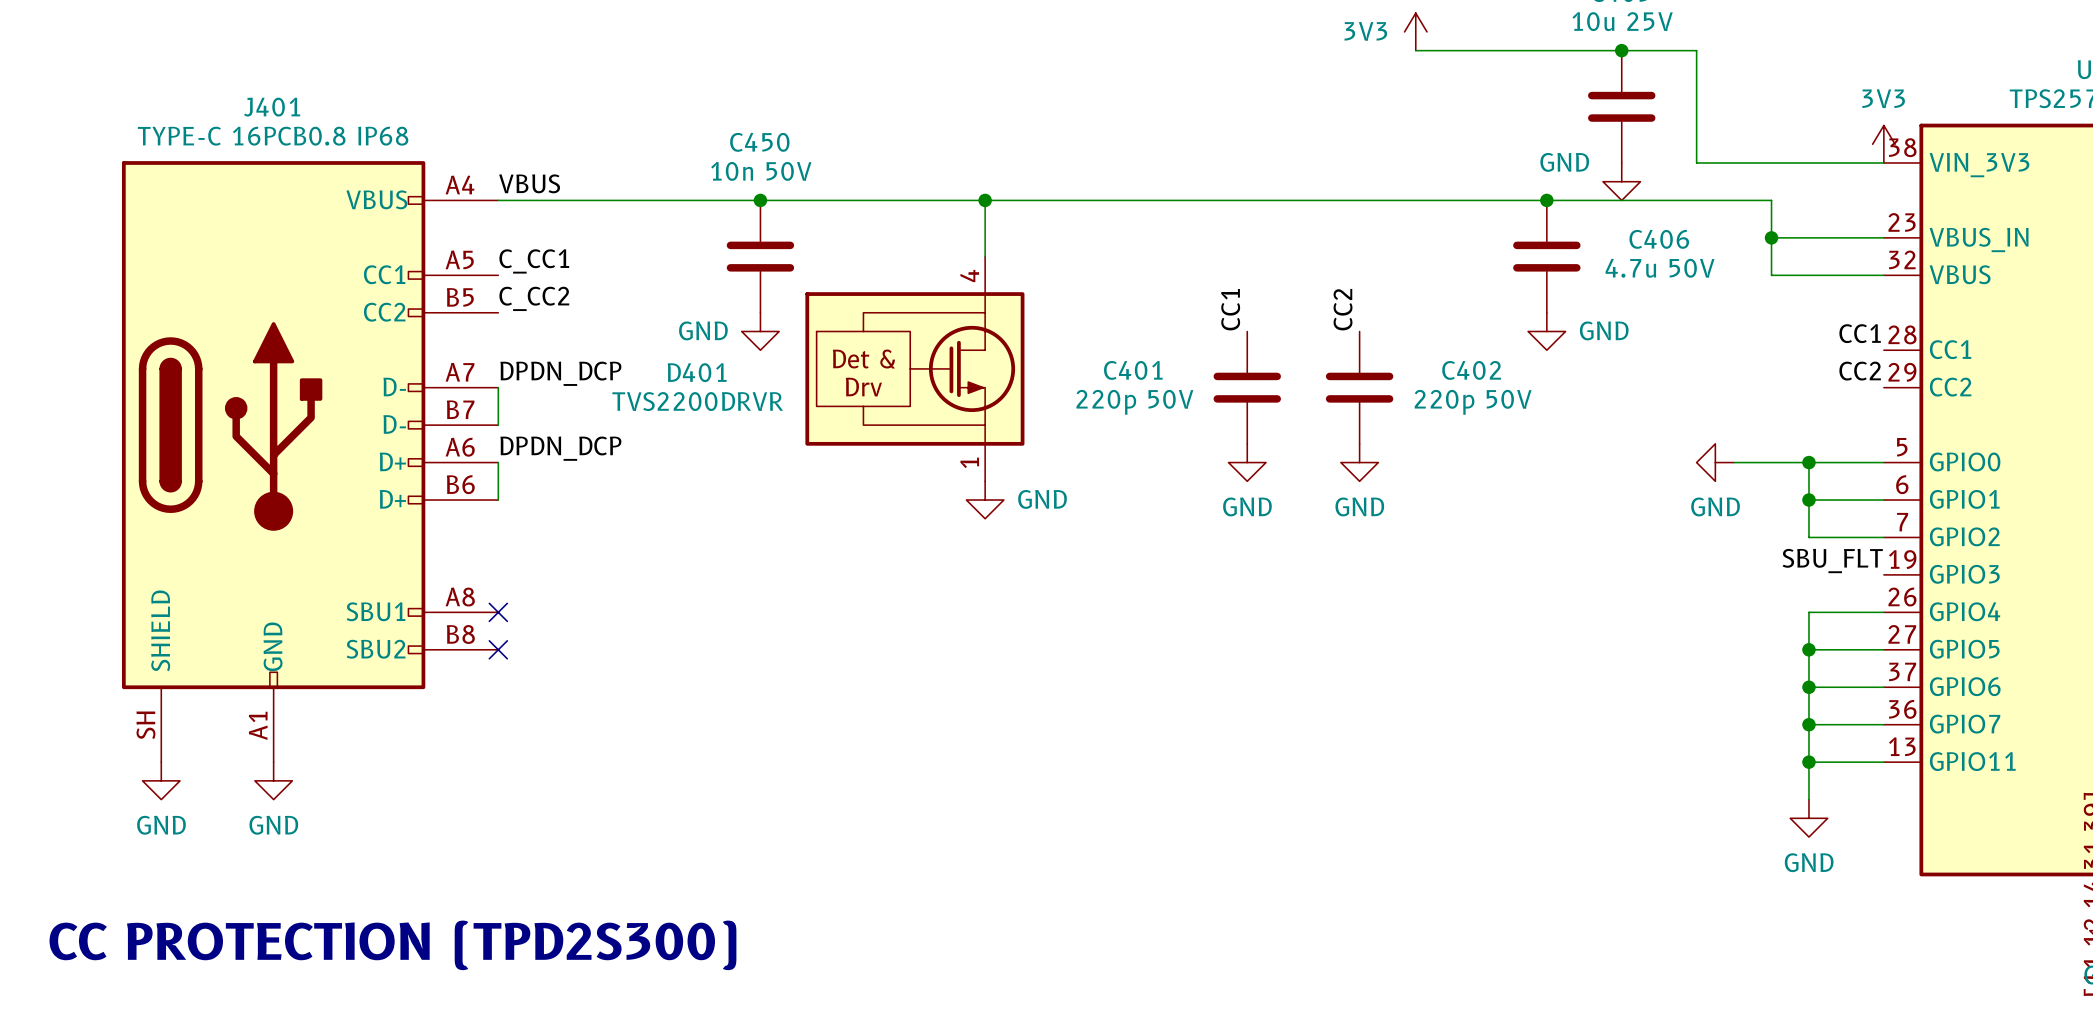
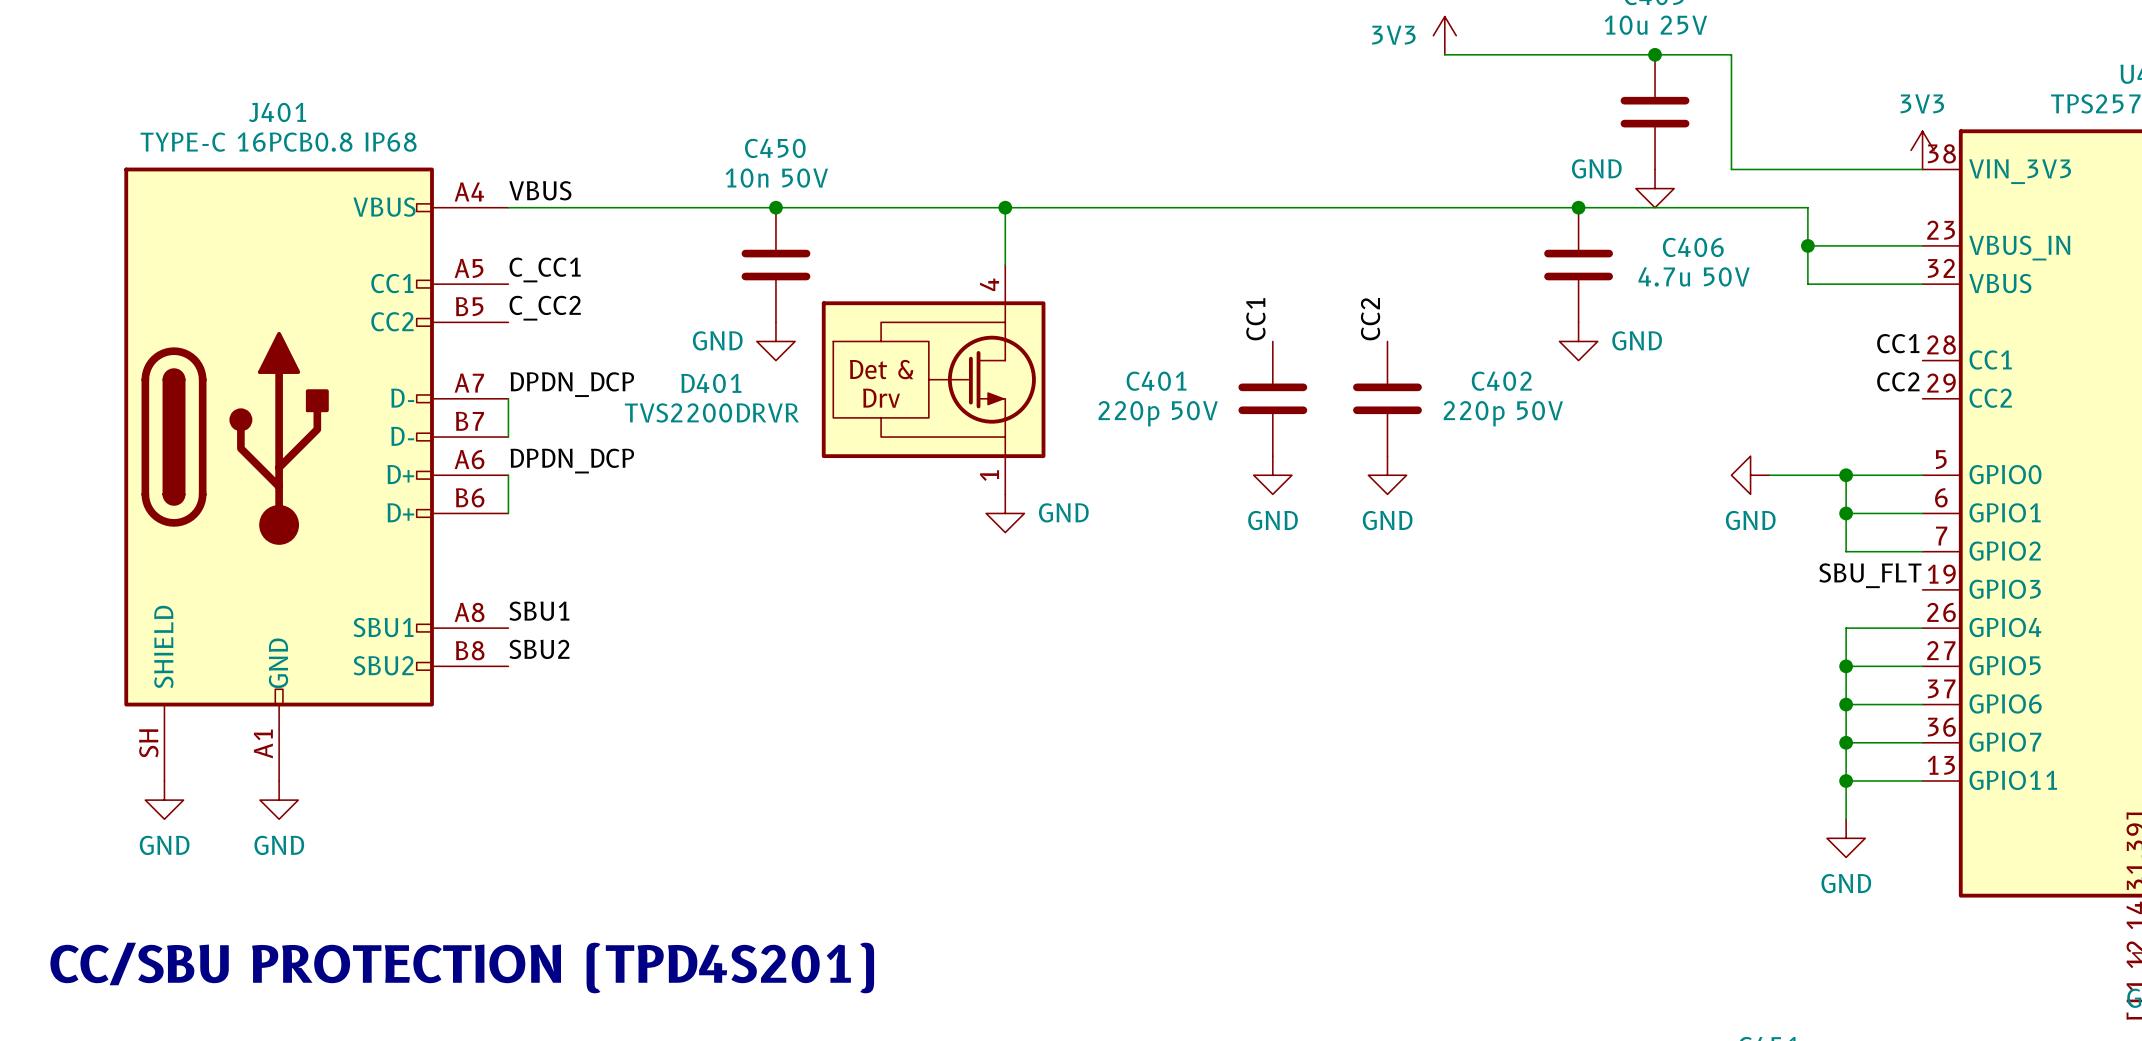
label: none -> SBU1 (539, 611)
no-connect mark: (498, 612) -> none
label: none -> SBU2 (539, 649)
no-connect mark: (498, 649) -> none
text: CC PROTECTION (TPD2S300) (392, 945) -> CC/SBU PROTECTION (TPD4S201) (462, 968)

